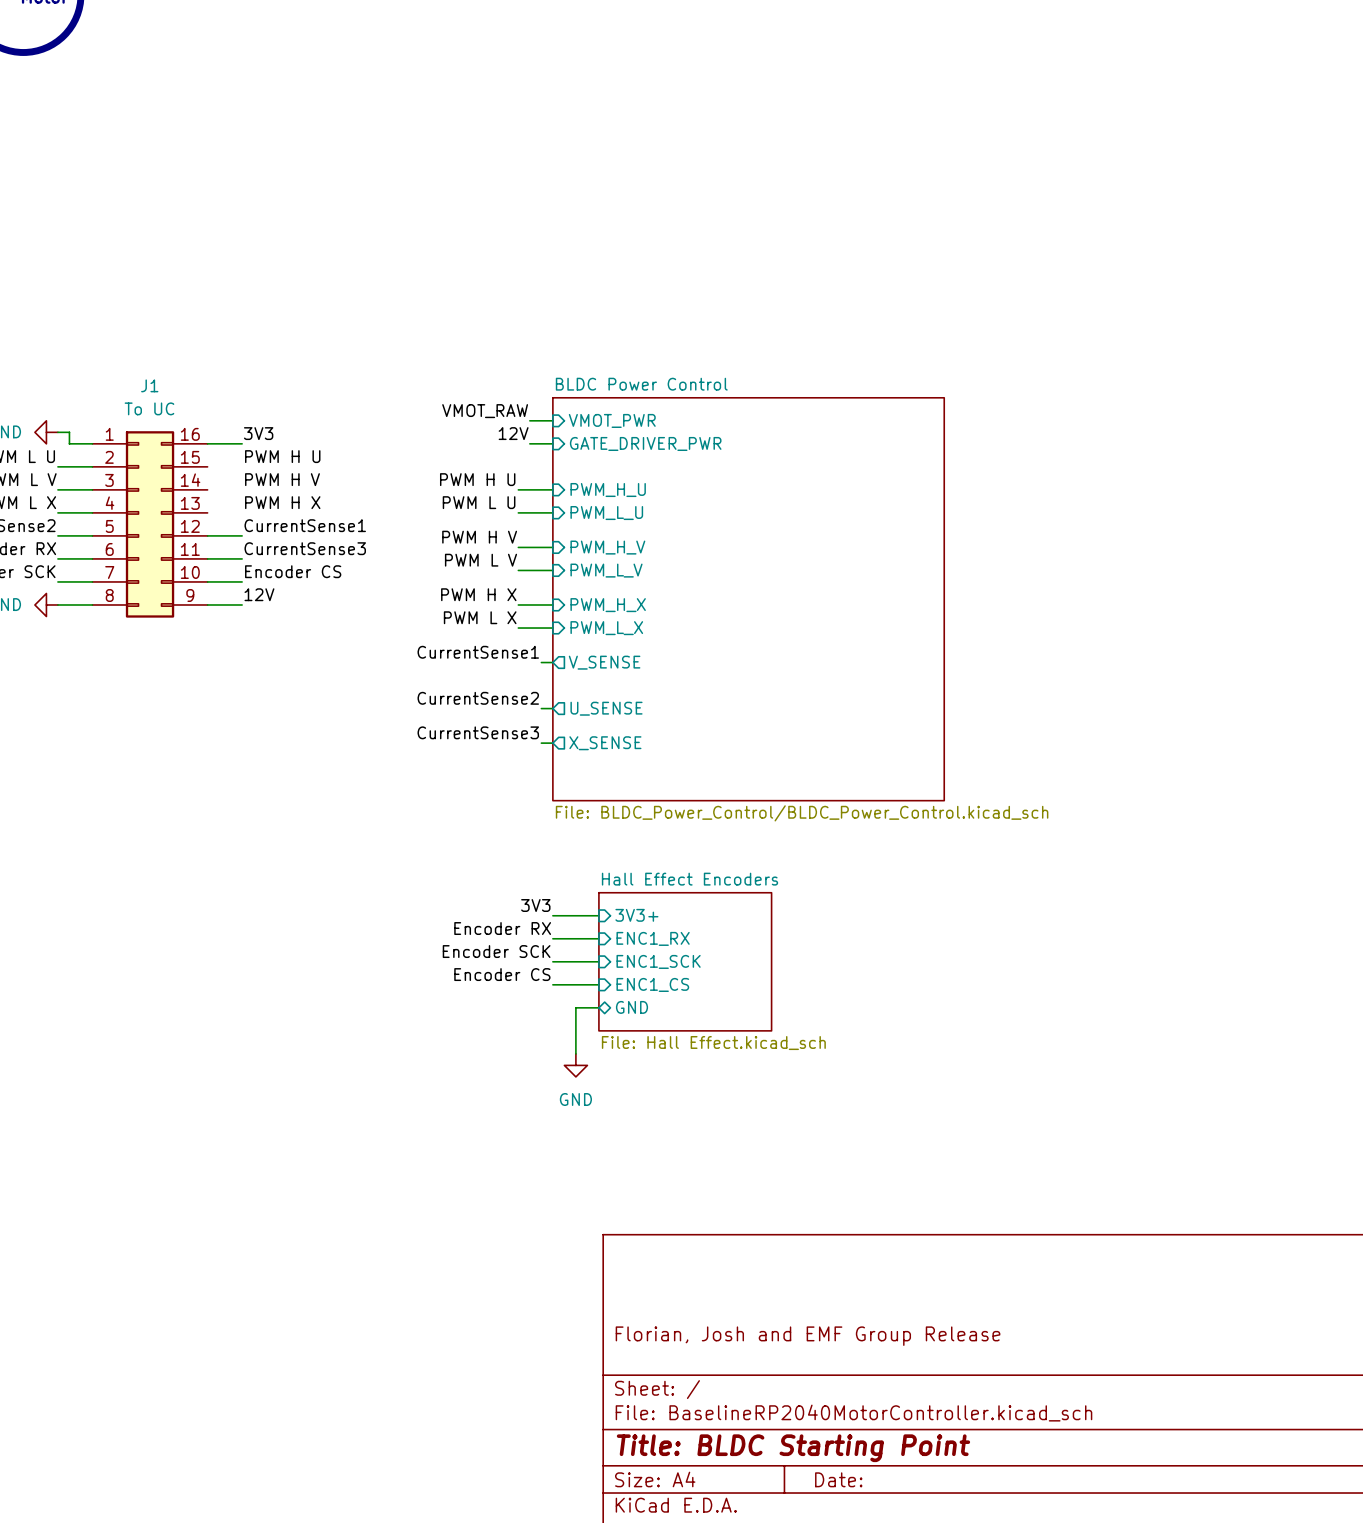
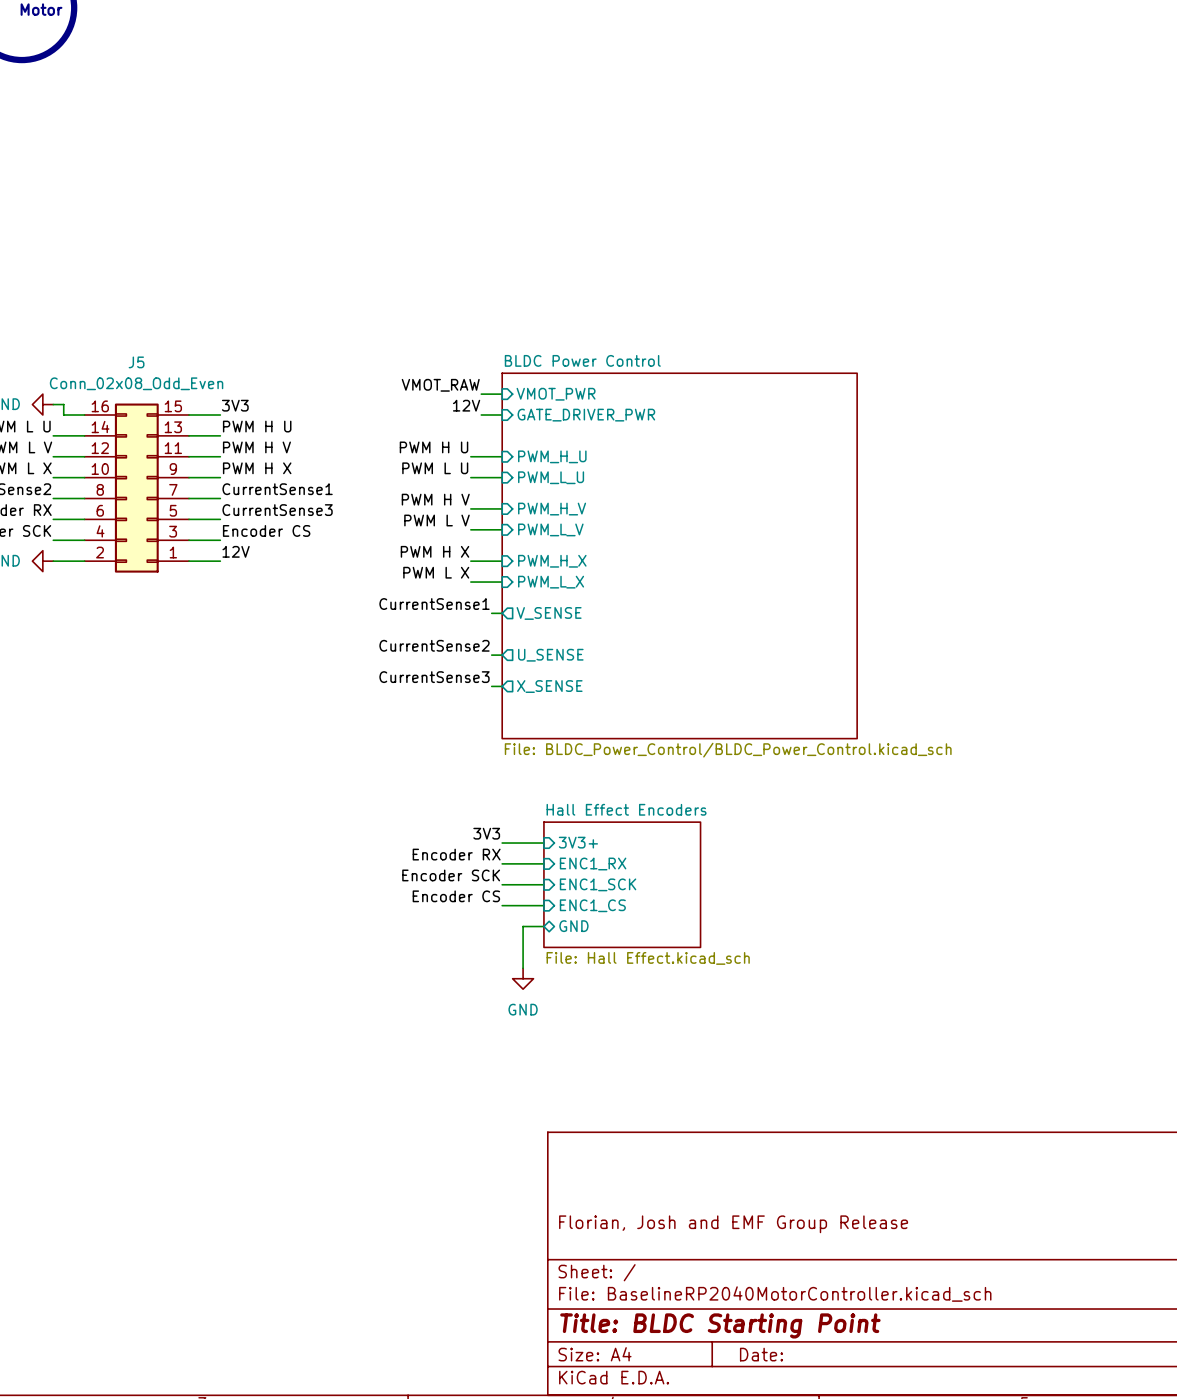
J1 name: J1 (149, 385) -> J5 (136, 362)
J1 value: To UC (149, 408) -> Conn_02x08_Odd_Even (136, 383)
J1 symbol: [92, 431, 208, 618] -> [84, 403, 190, 573]
wire: none -> (189, 435) (220, 435)
wire: none -> (189, 456) (220, 456)
wire: none -> (189, 477) (220, 477)

